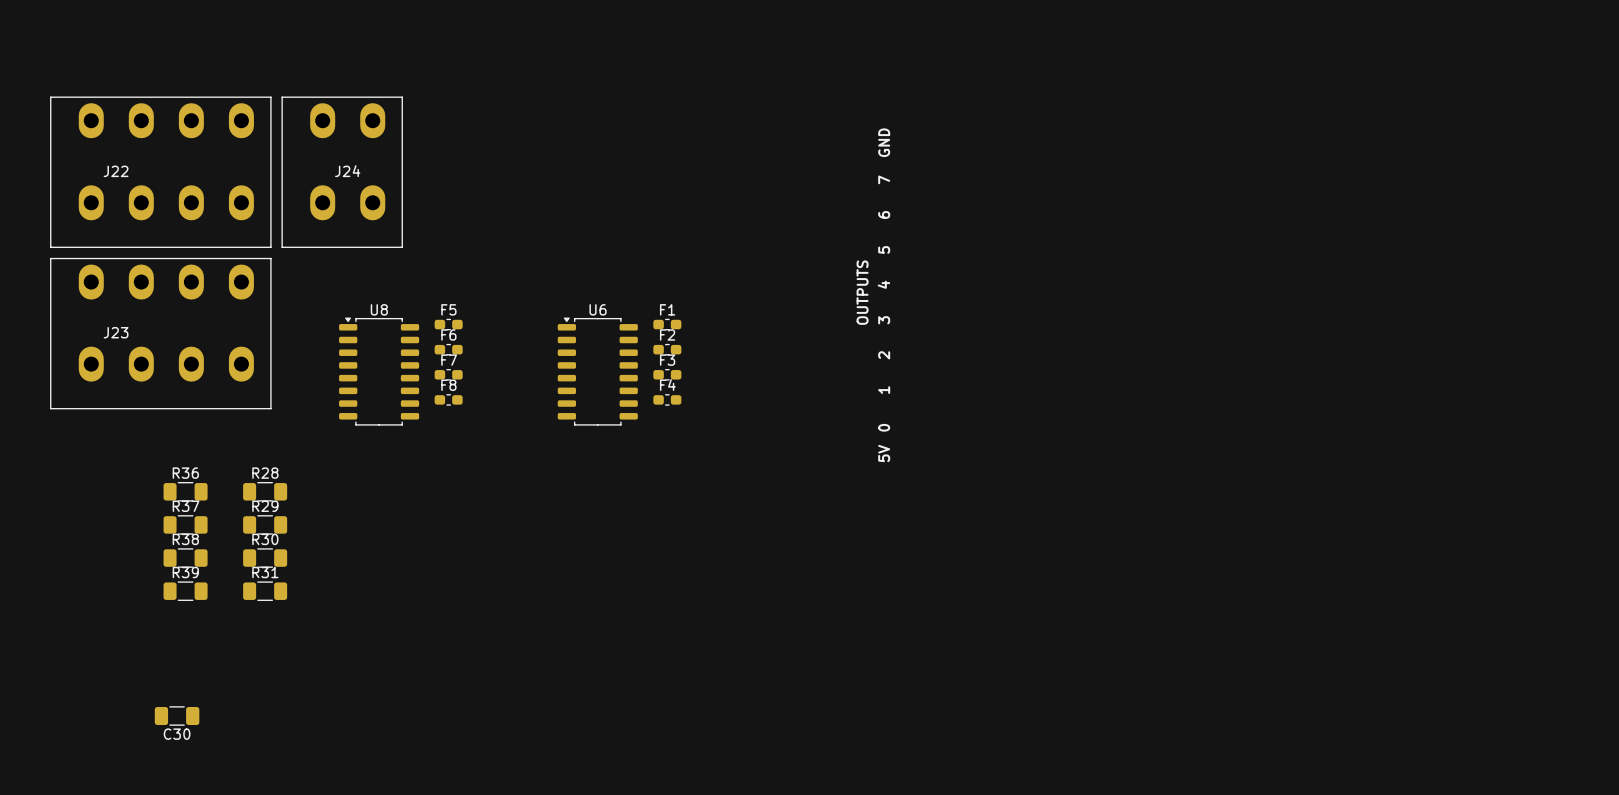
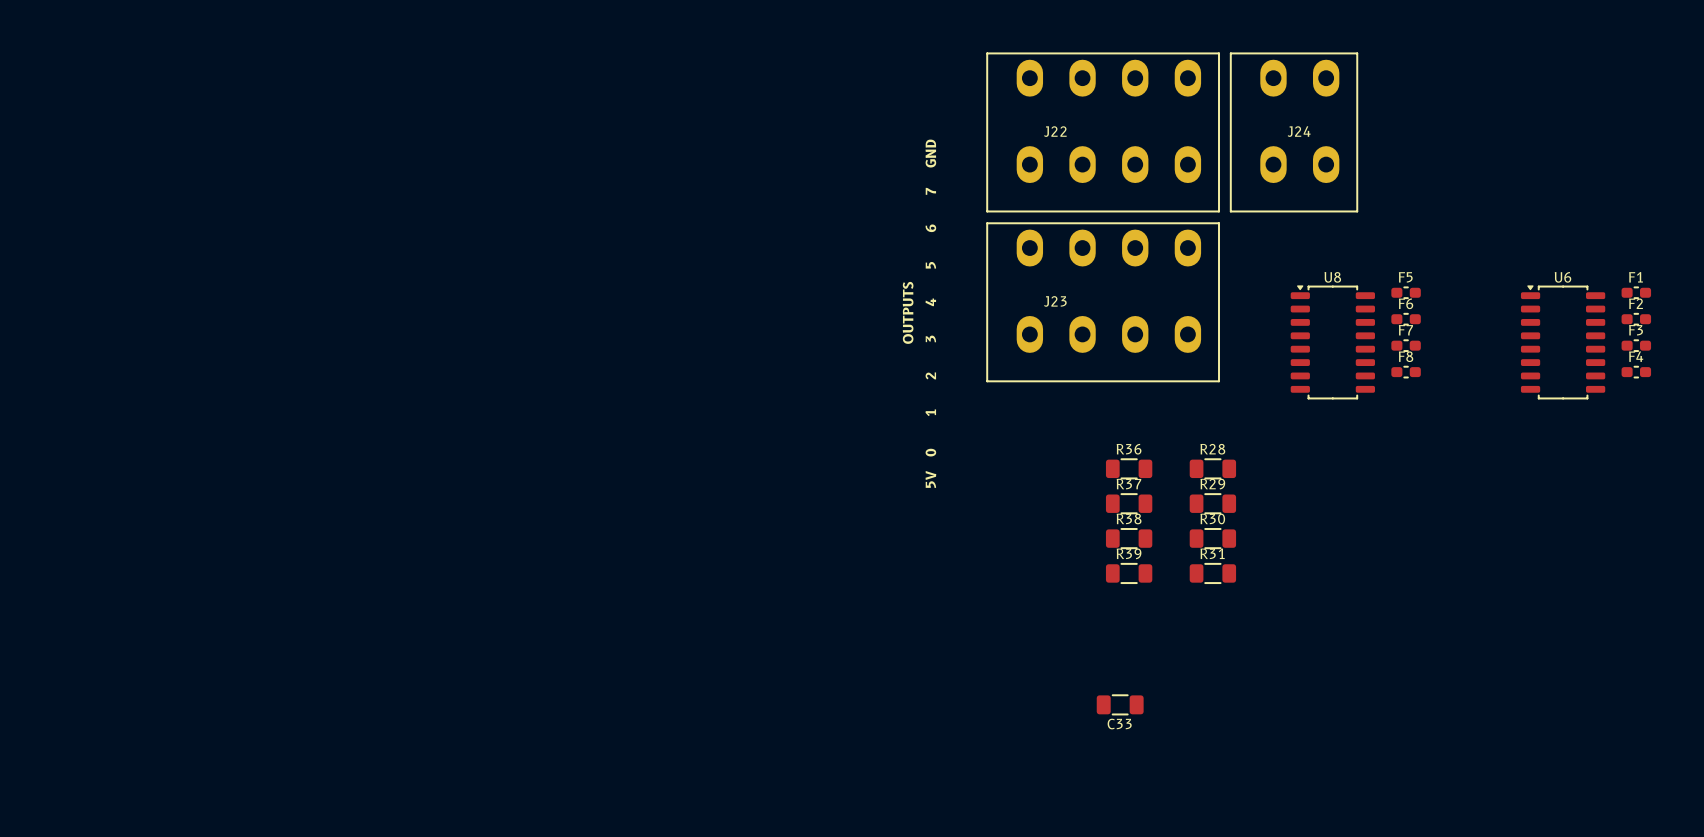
J22 position: (160, 172) -> (1103, 132)
J24 position: (342, 172) -> (1294, 132)
F5 position: (448, 324) -> (1406, 292)
F1 position: (667, 324) -> (1636, 292)
J23 position: (160, 333) -> (1103, 302)
F6 position: (448, 349) -> (1406, 319)
F2 position: (667, 349) -> (1636, 319)
U8 position: (379, 371) -> (1332, 342)
U6 position: (597, 371) -> (1563, 342)
F7 position: (448, 374) -> (1406, 345)
F3 position: (667, 374) -> (1636, 345)
F8 position: (448, 399) -> (1406, 372)
F4 position: (667, 399) -> (1636, 372)
R36 position: (185, 491) -> (1129, 468)
R28 position: (265, 491) -> (1212, 468)
R37 position: (185, 524) -> (1129, 503)
R29 position: (265, 524) -> (1212, 503)
R38 position: (185, 558) -> (1129, 538)
R30 position: (265, 558) -> (1212, 538)
R39 position: (185, 591) -> (1129, 573)
R31 position: (265, 591) -> (1212, 573)
C33: none -> (1120, 704)
C30: (177, 716) -> none

